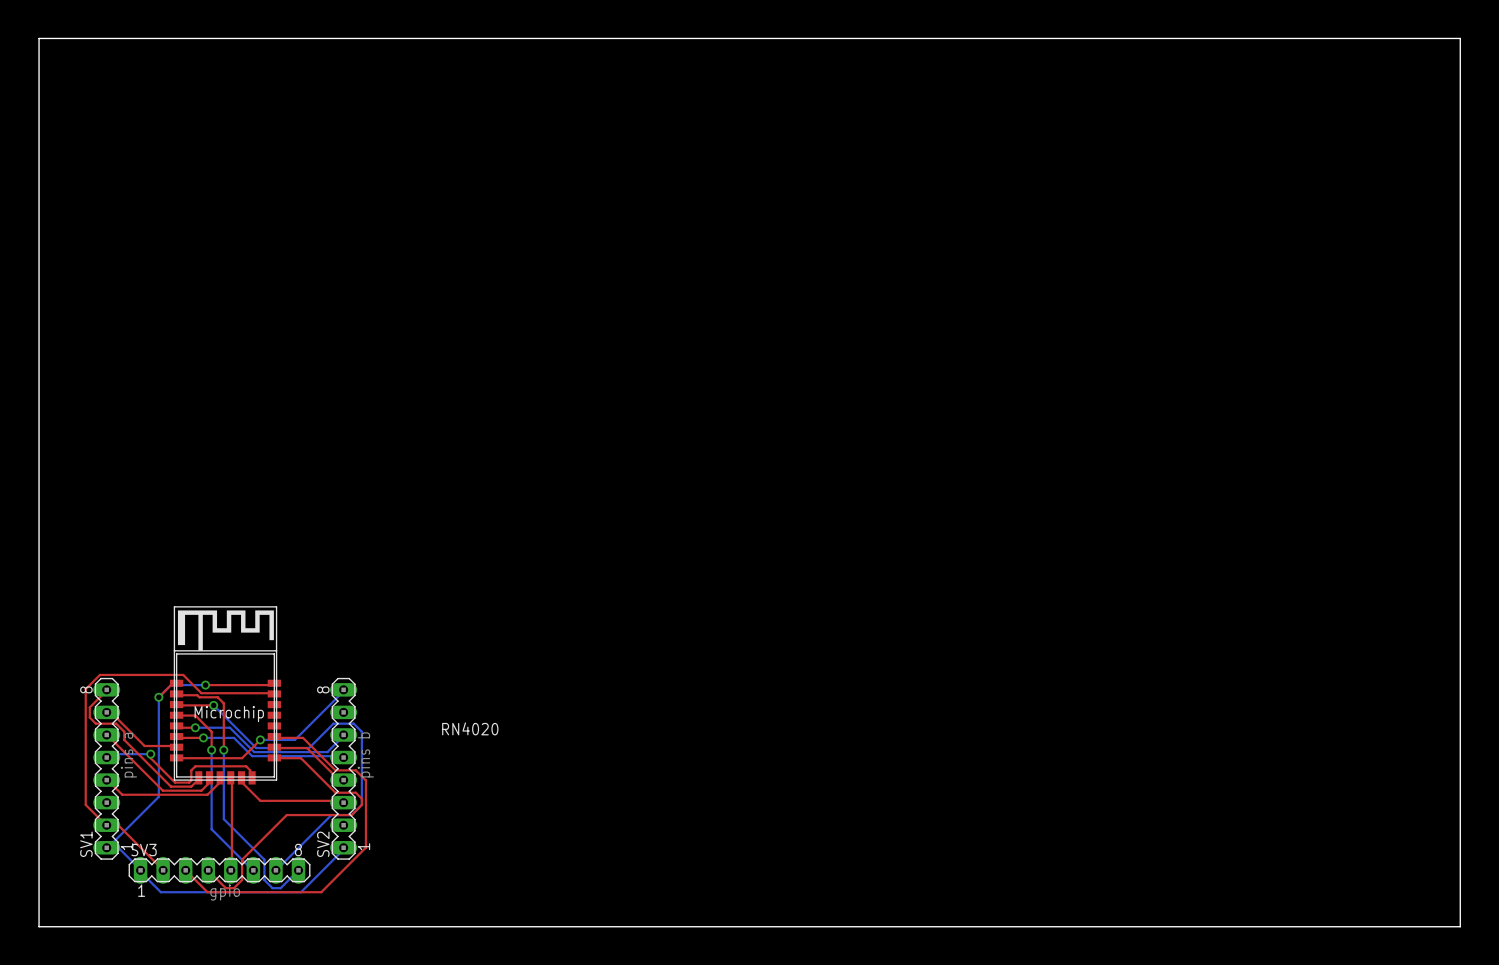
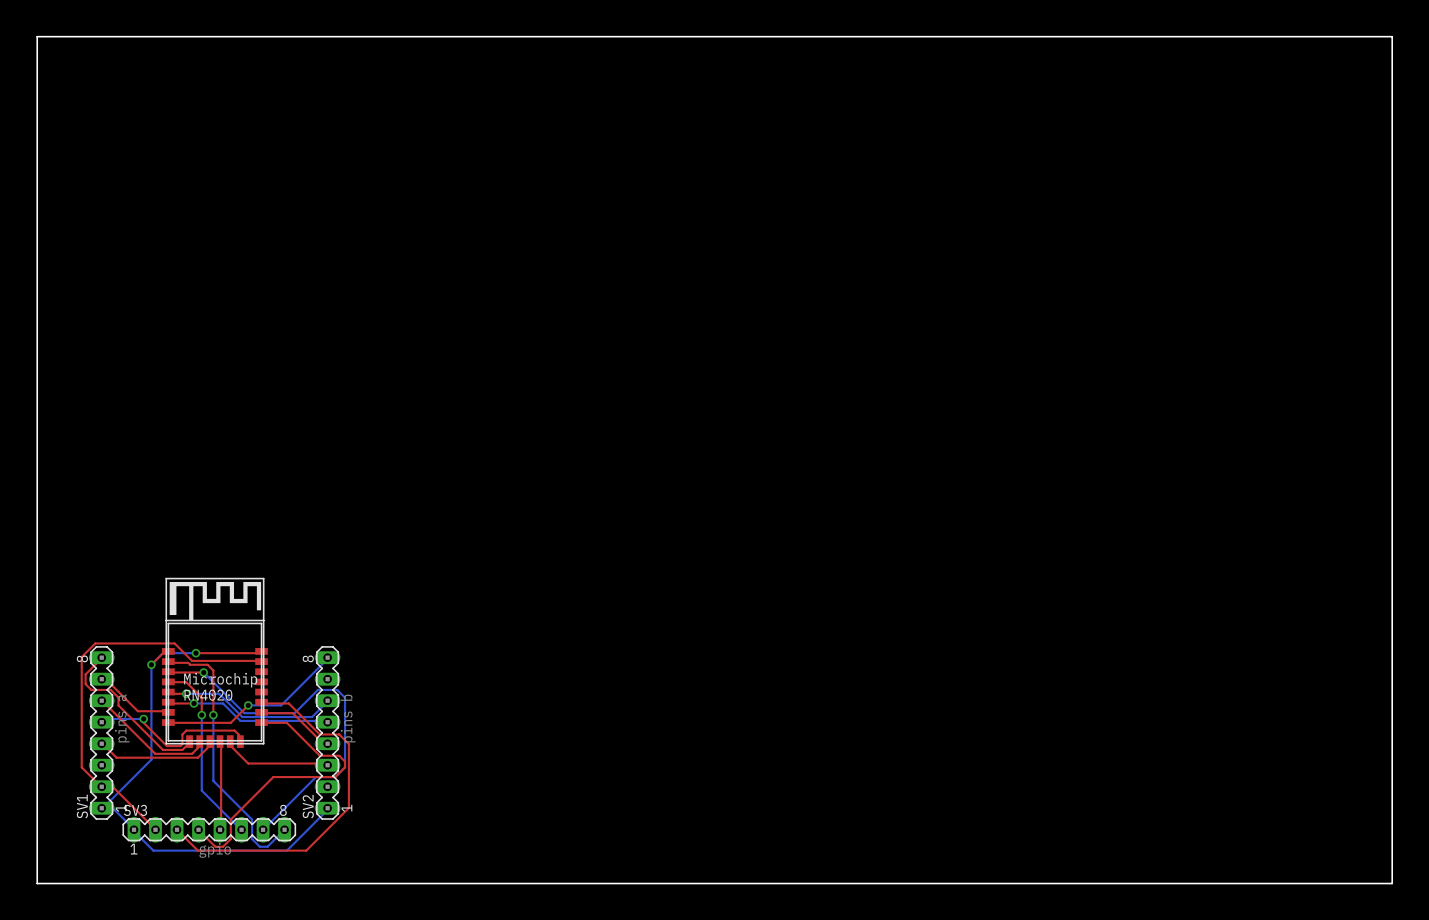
part footprint: [169, 606, 282, 785] -> [162, 578, 268, 748]

